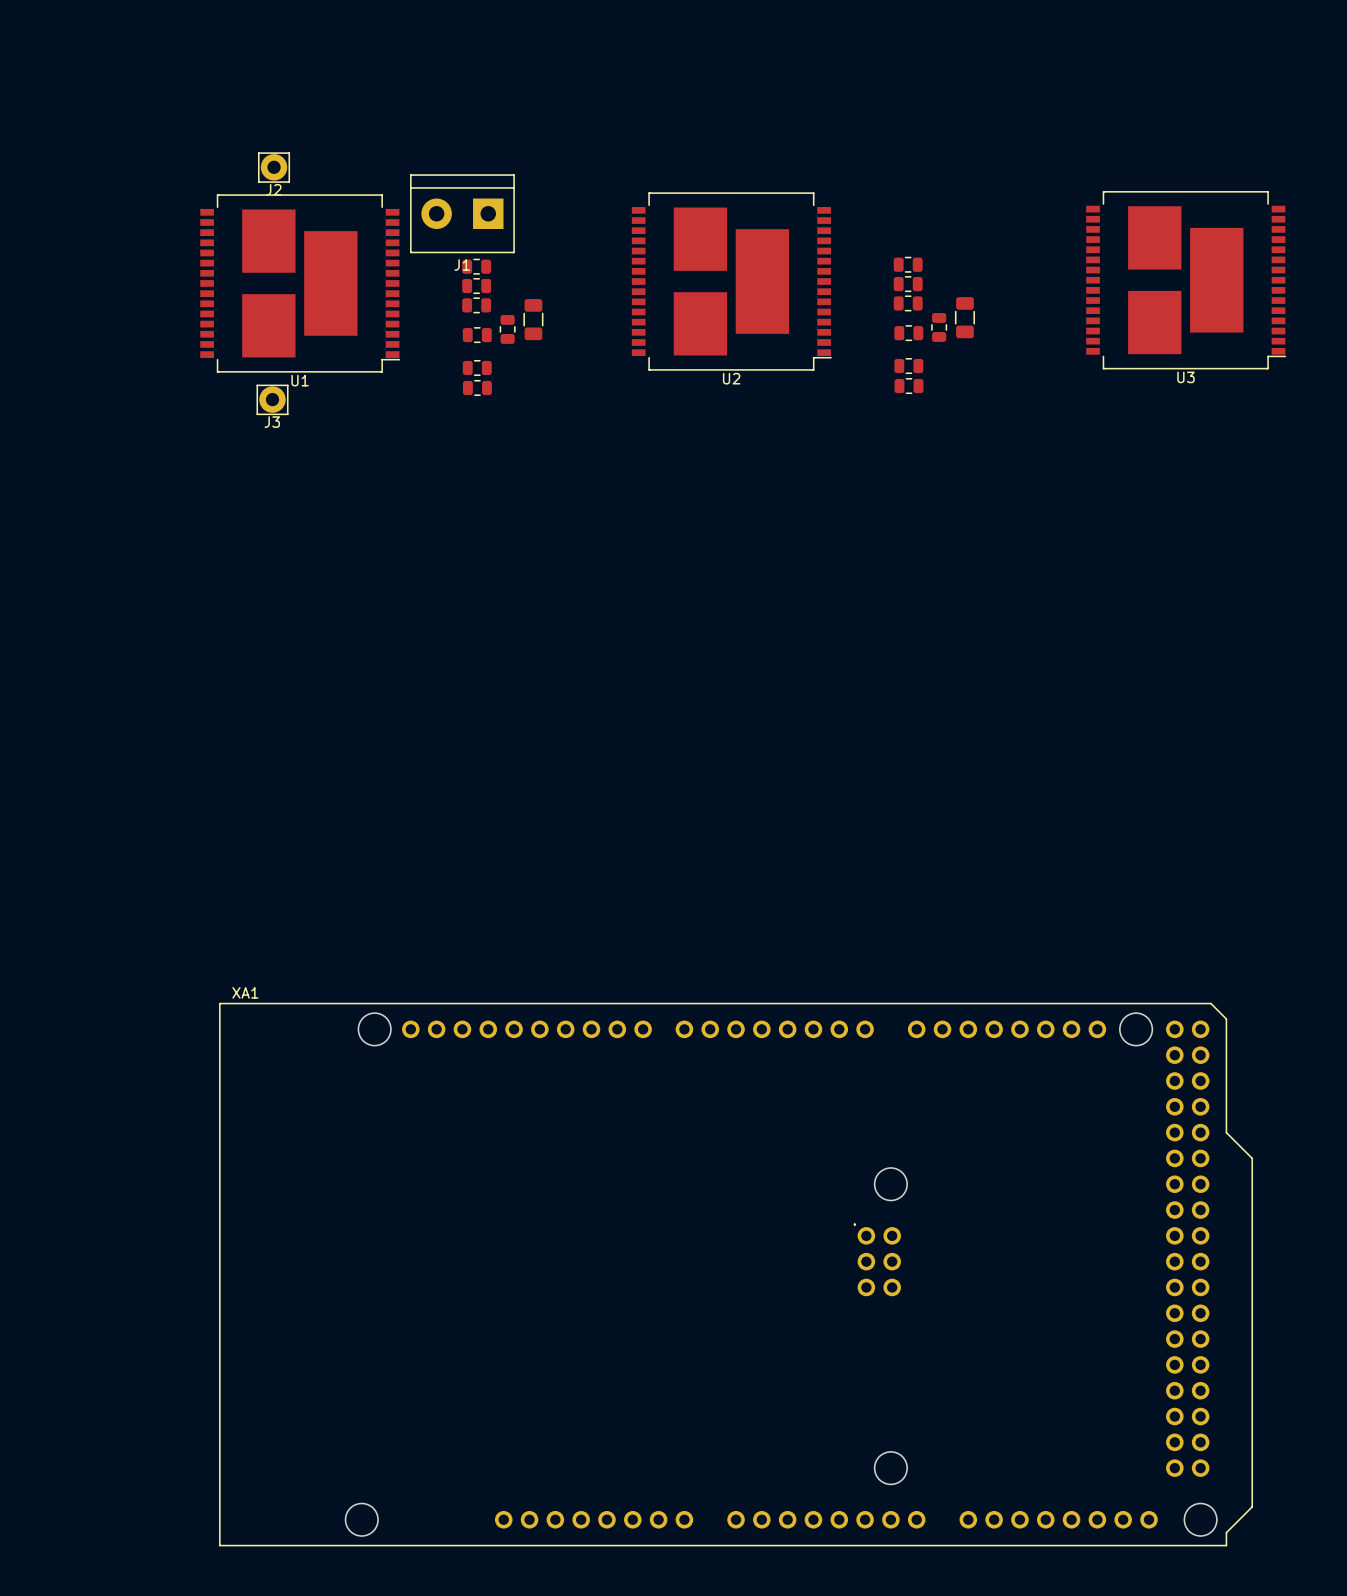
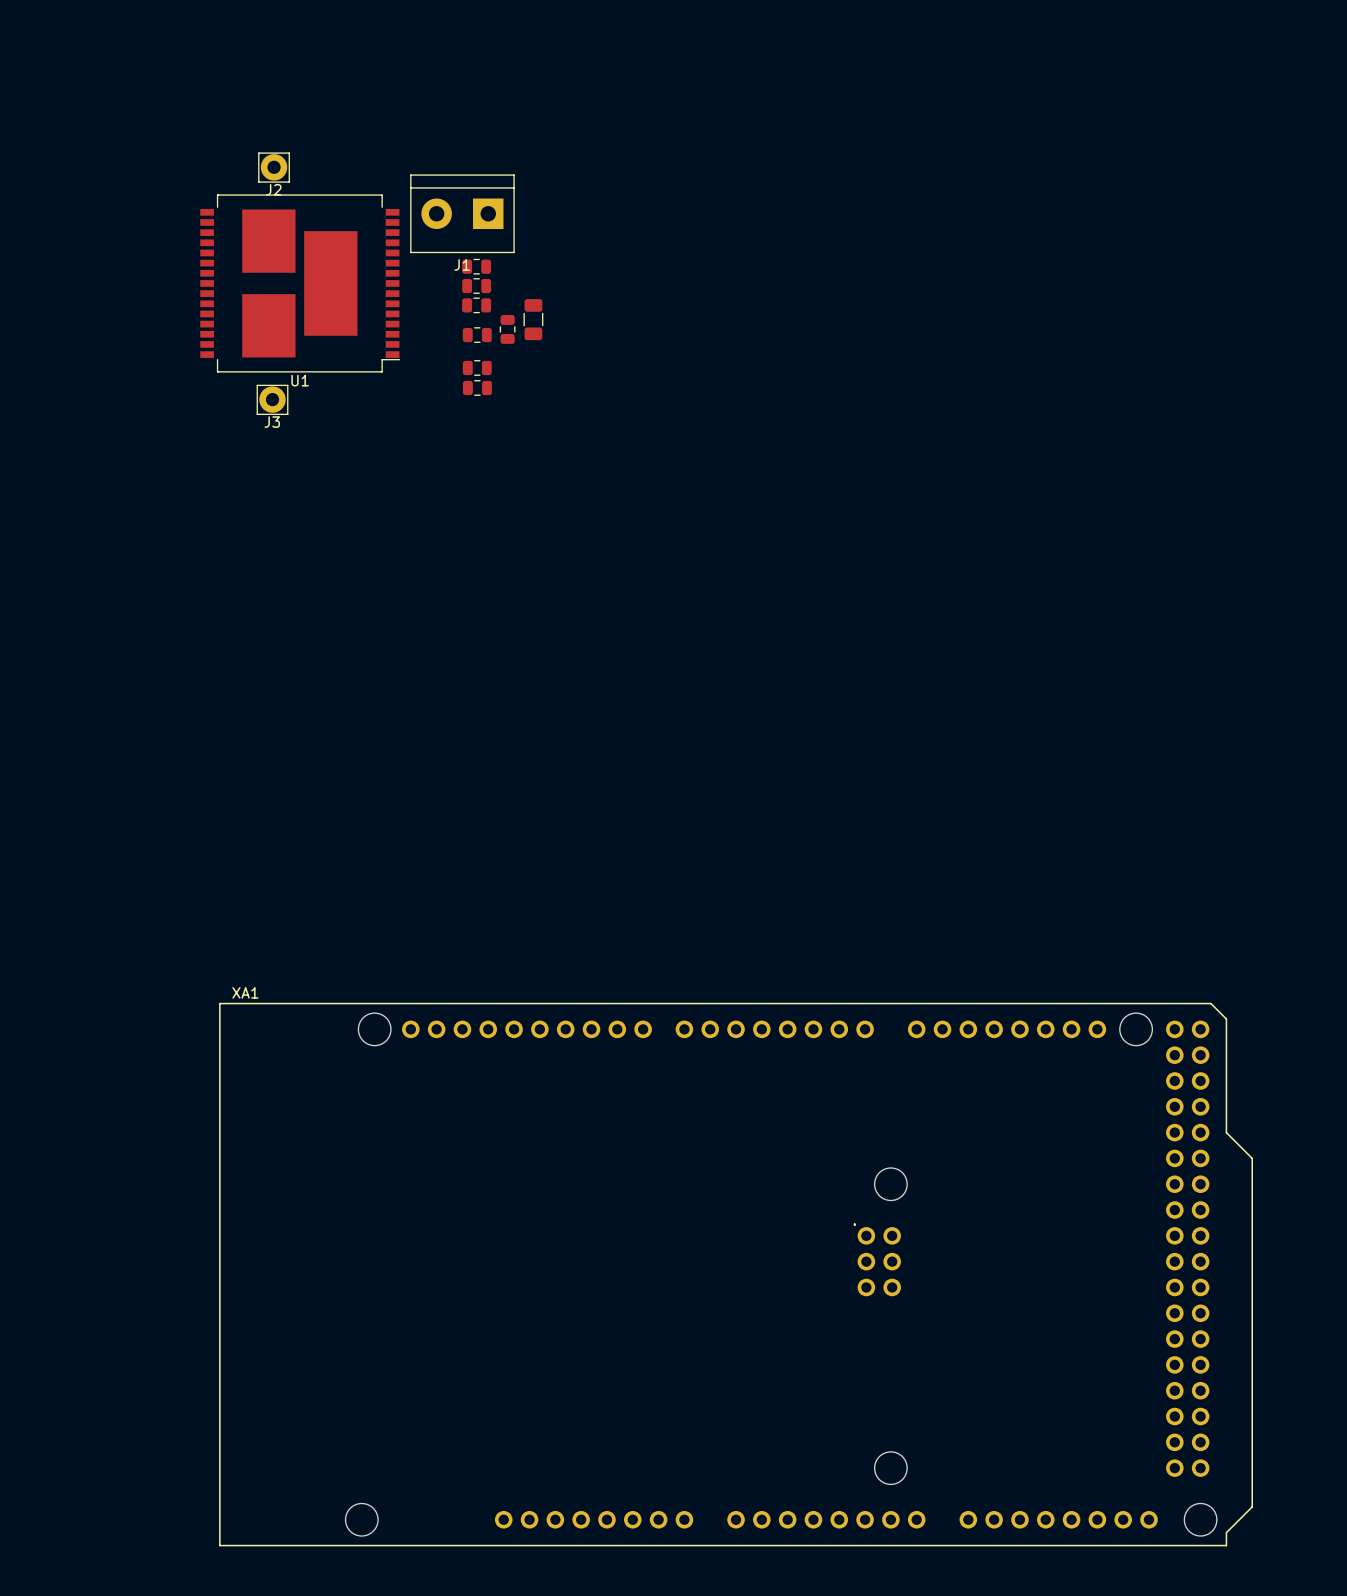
part: (908, 264) -> none
U3: (1186, 280) -> none
U2: (731, 281) -> none
part: (908, 284) -> none
part: (908, 303) -> none
part: (964, 317) -> none
part: (939, 327) -> none
part: (908, 333) -> none
part: (908, 366) -> none
part: (908, 386) -> none

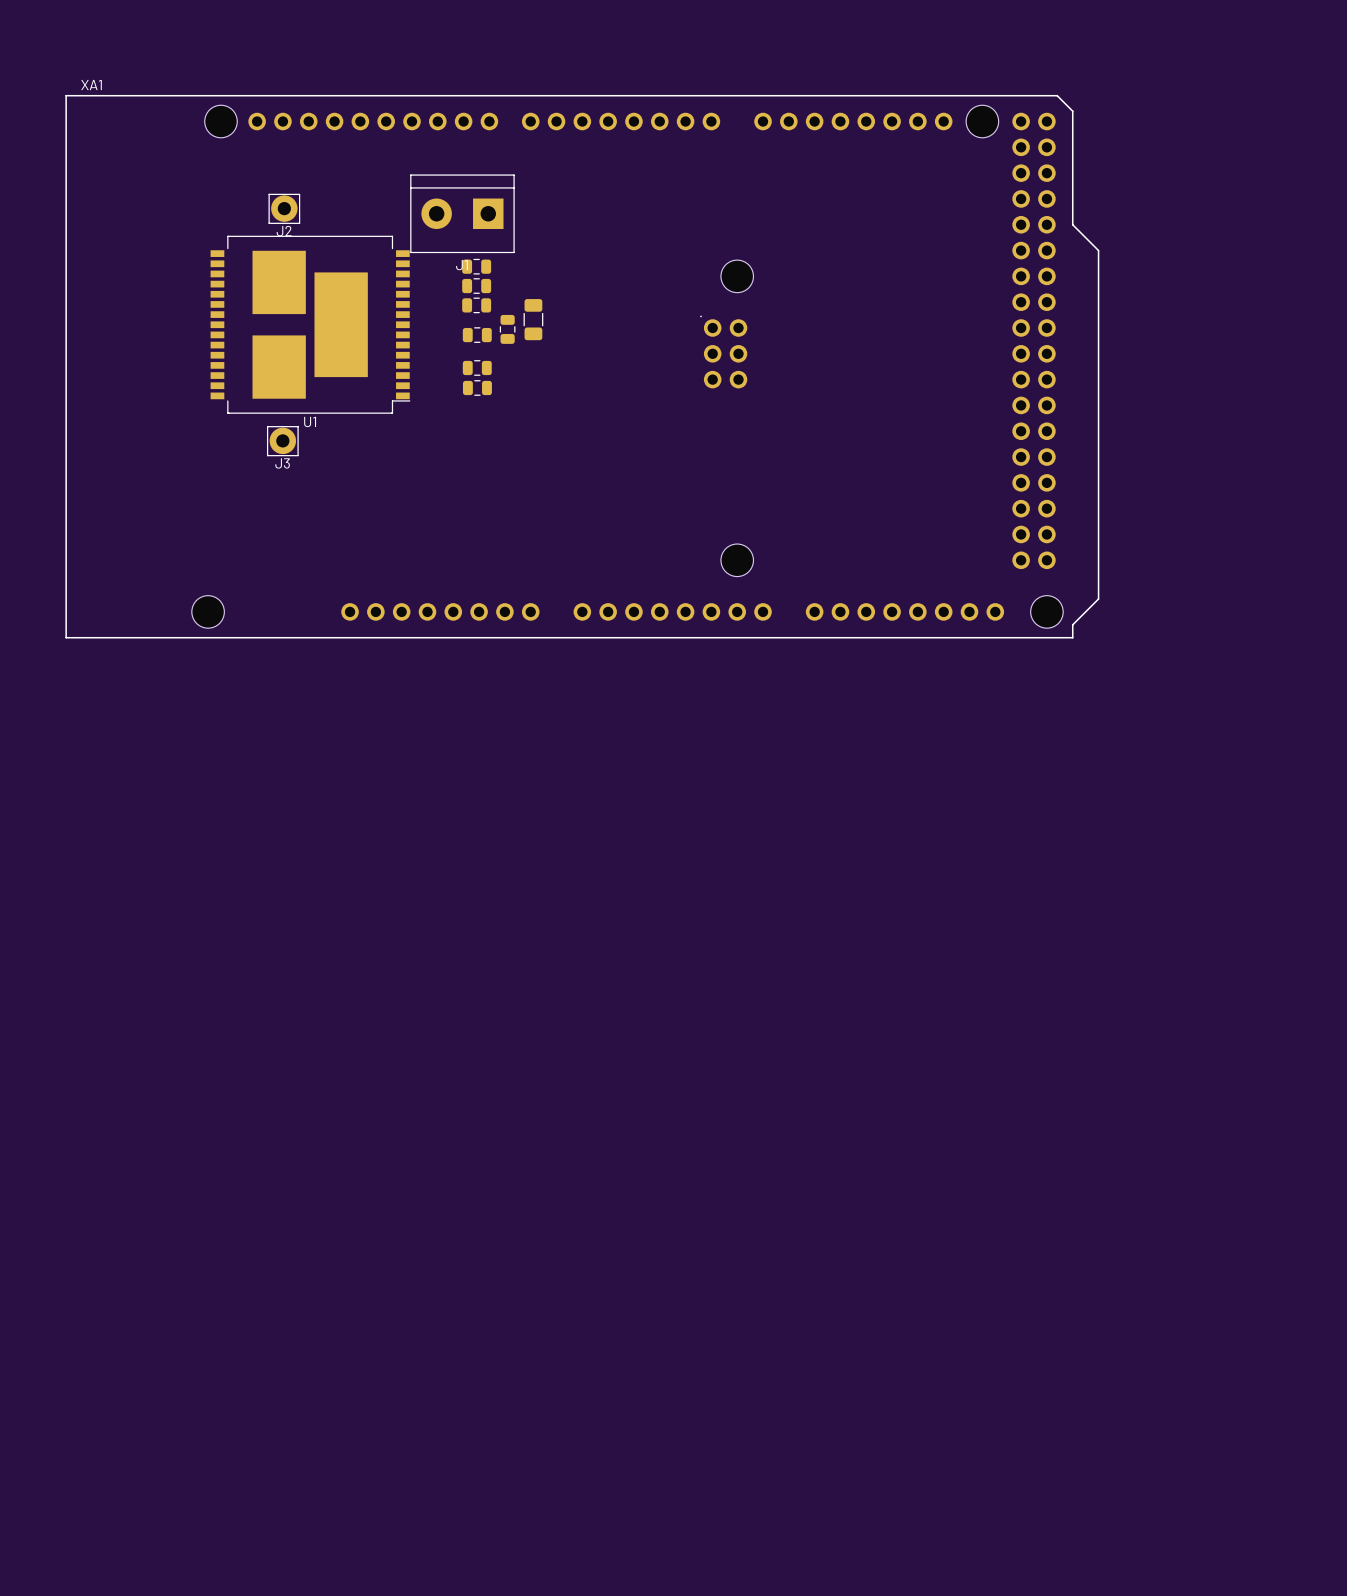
J2 position: (274, 167) -> (284, 208)
U1 position: (300, 283) -> (310, 324)
J3 position: (272, 399) -> (282, 441)
XA1 position: (736, 1274) -> (582, 366)

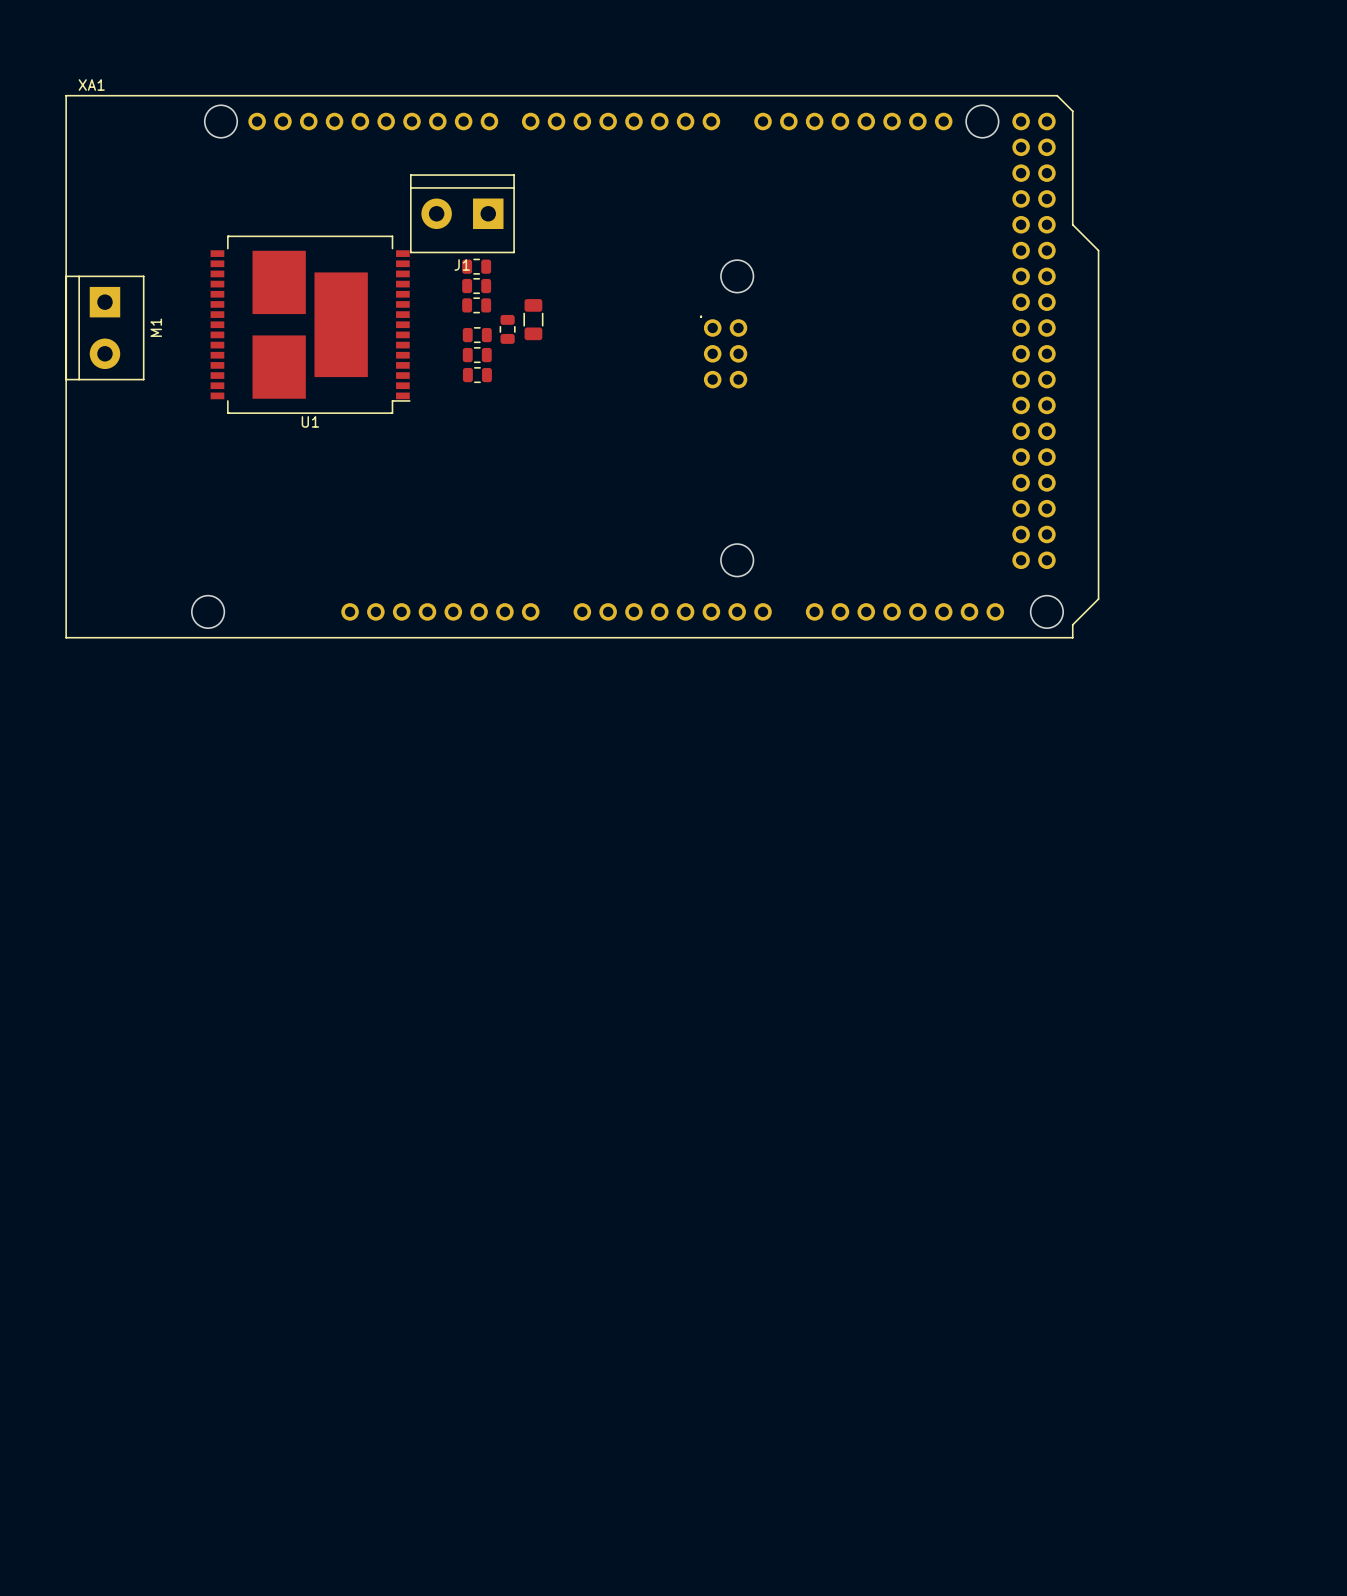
J2: (284, 208) -> none
M1: none -> (104, 327)
part: none -> (477, 355)
part: (477, 367) -> none
part: none -> (477, 375)
part: (477, 387) -> none
J3: (282, 441) -> none

